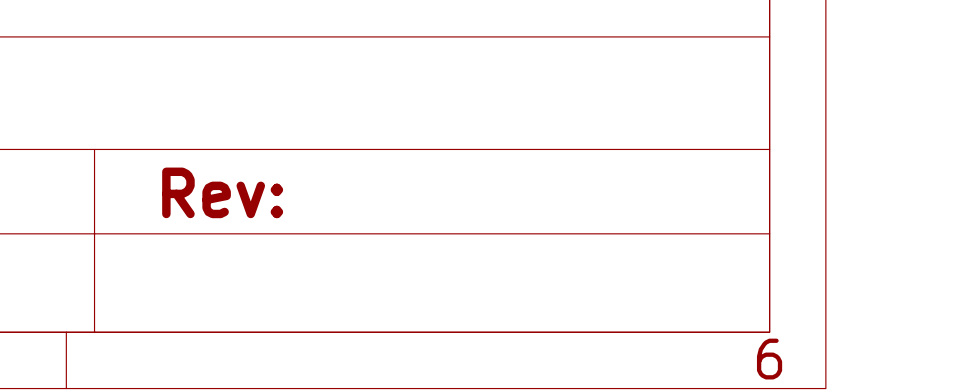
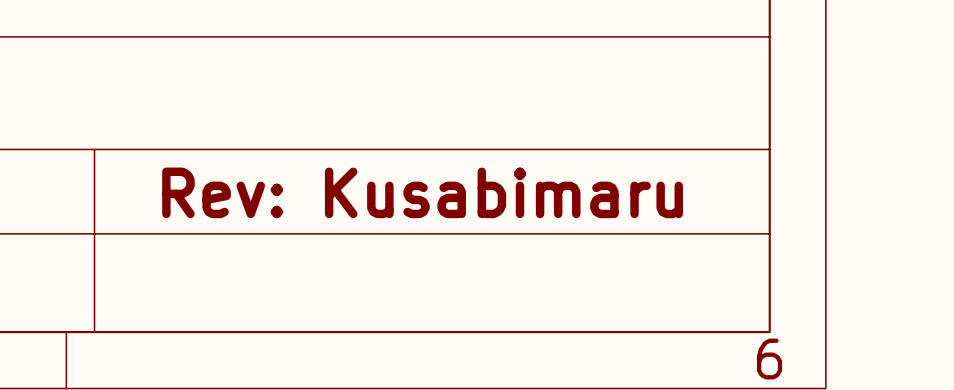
title block: Rev: (222, 192) -> Rev: Kusabimaru (422, 192)

